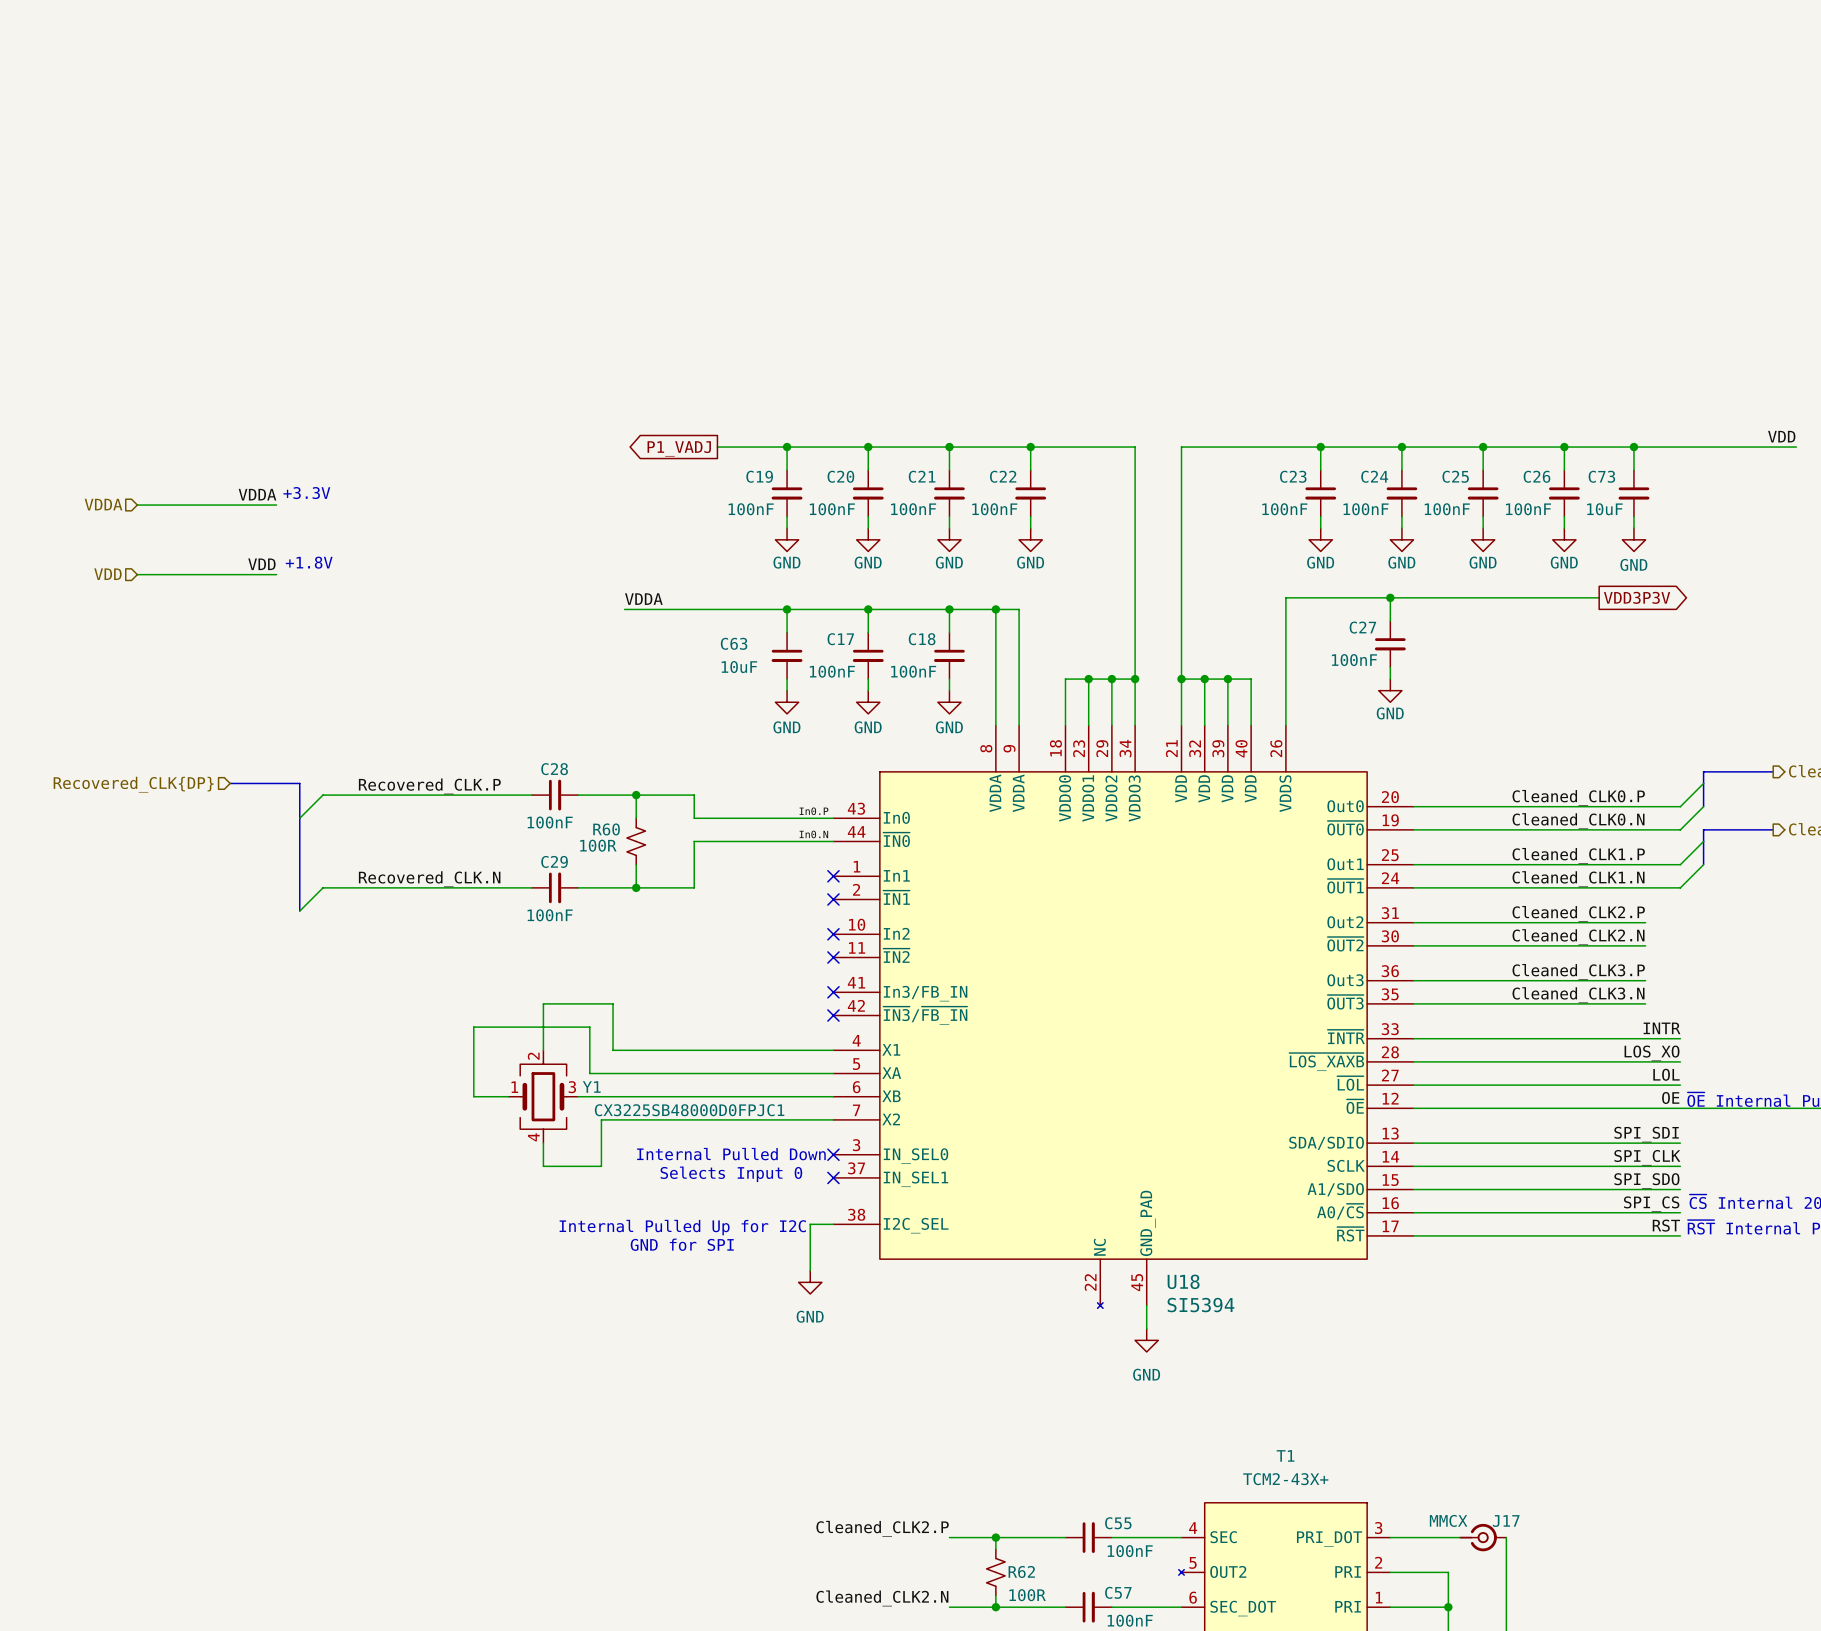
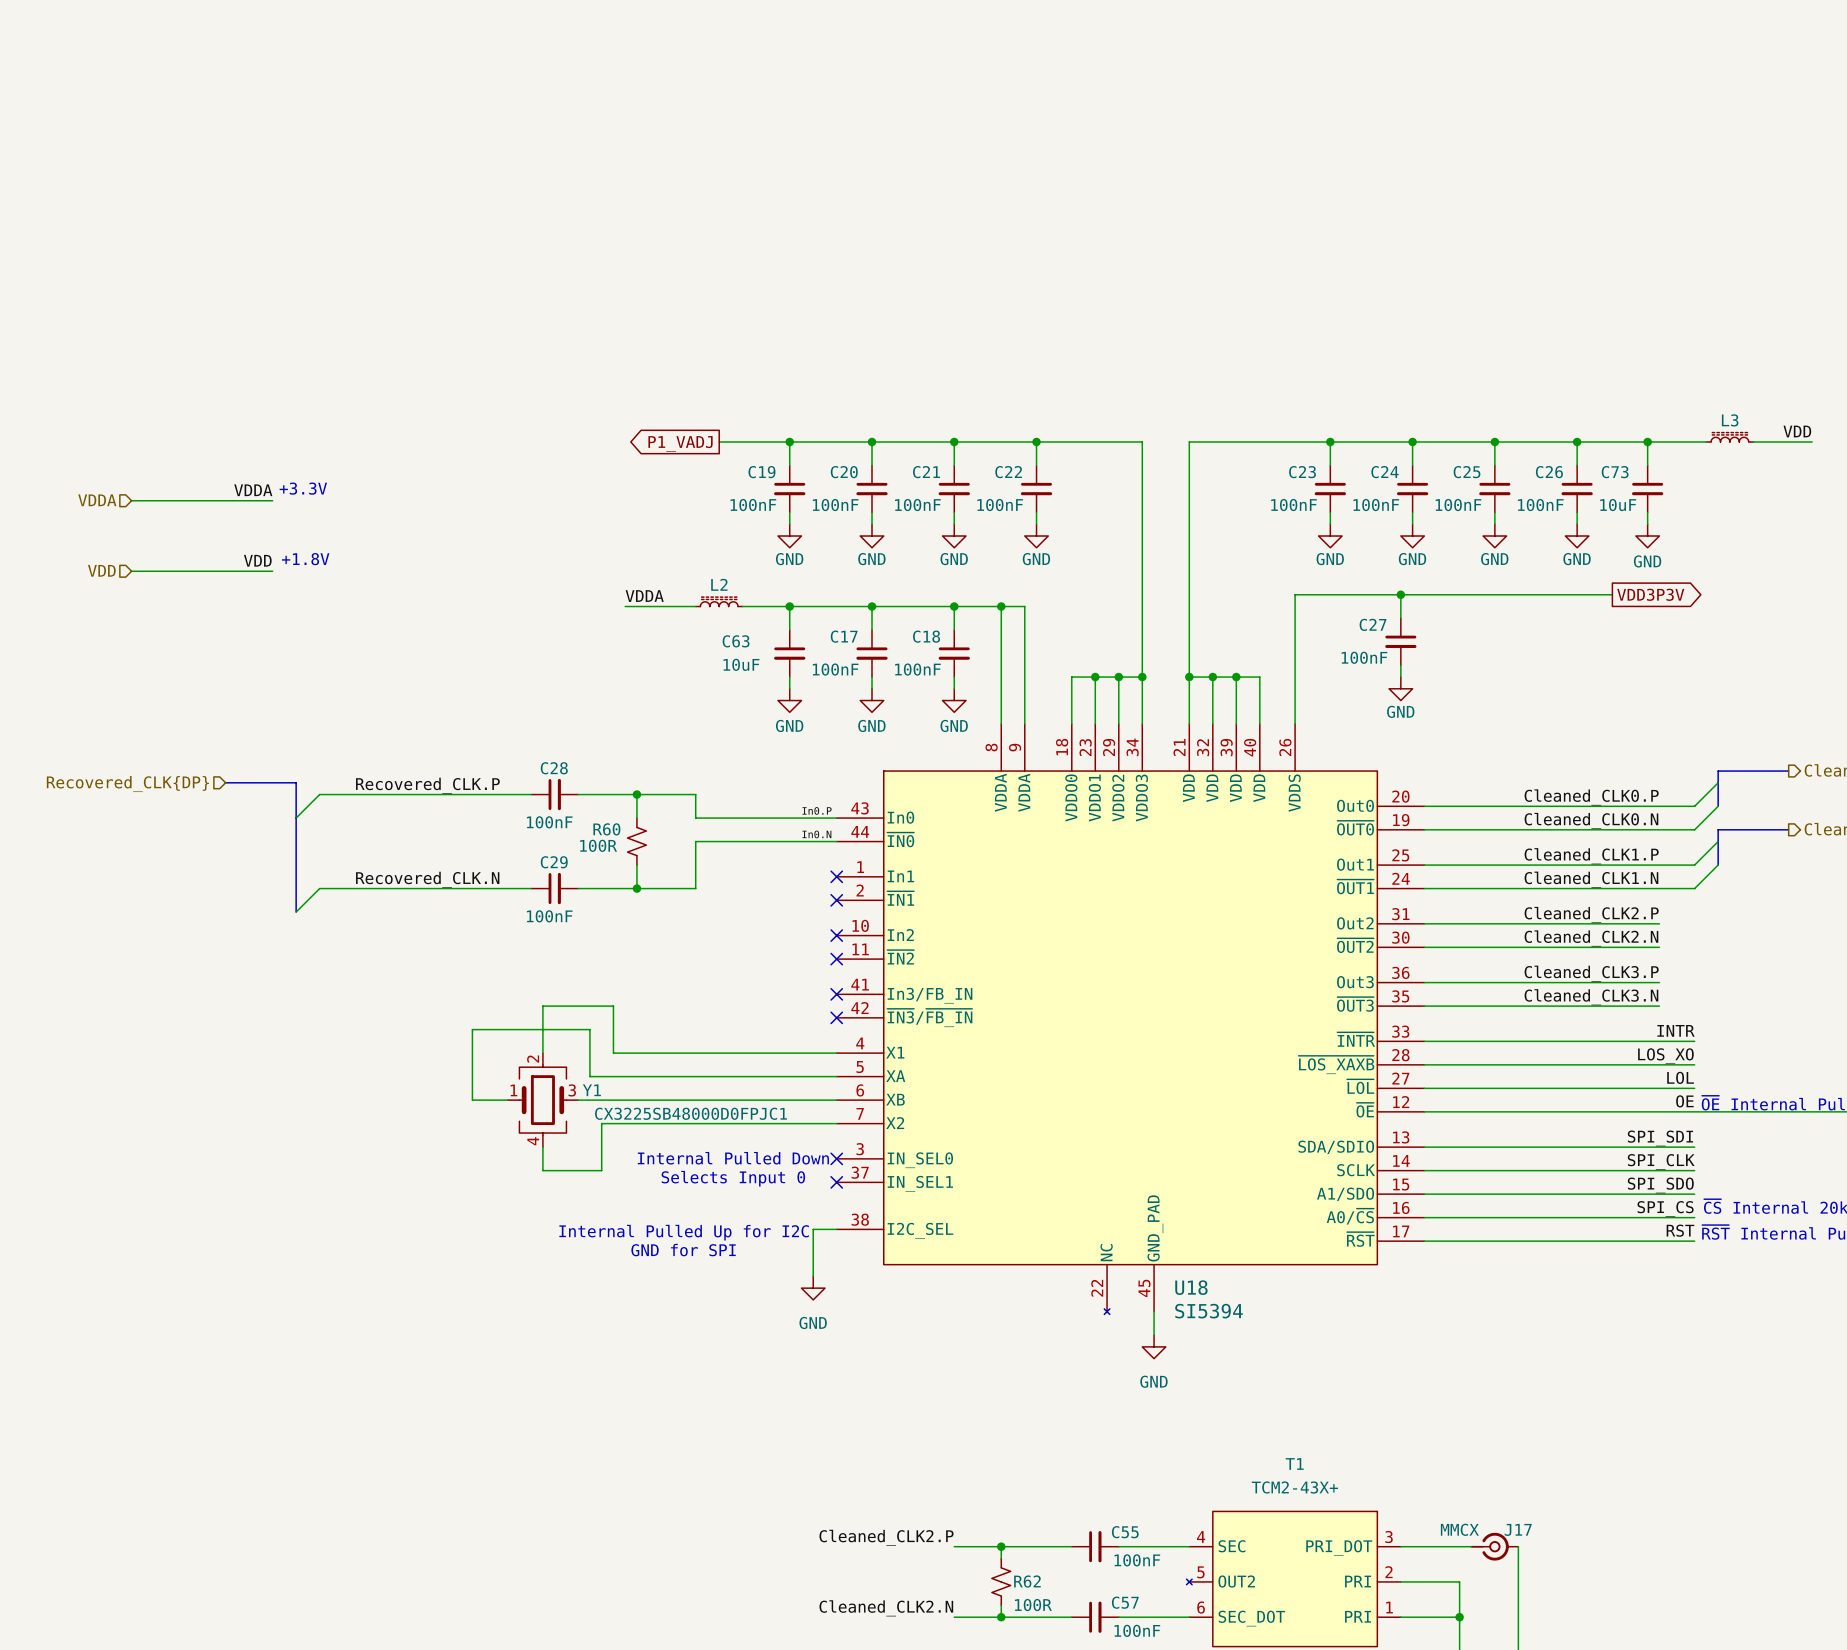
L3: none -> (1729, 437)
wire: (1691, 447) (1738, 447) -> none
L2: none -> (719, 601)
wire: (694, 609) (740, 609) -> none

